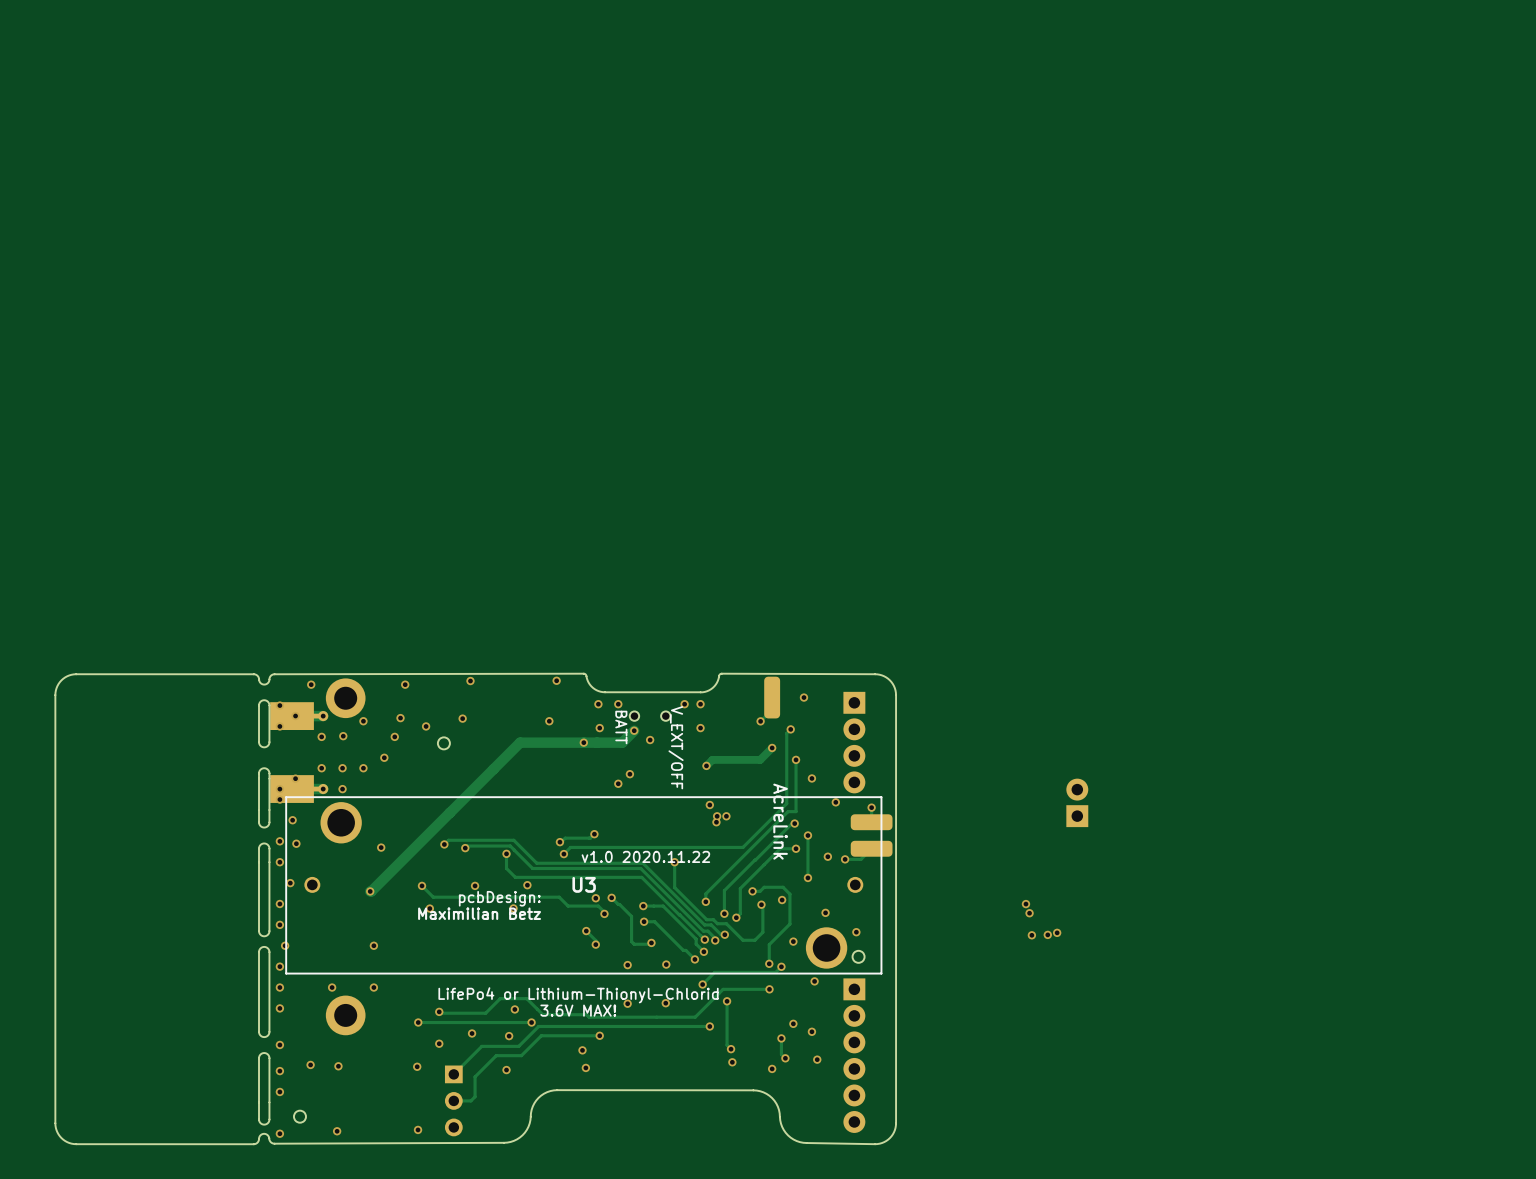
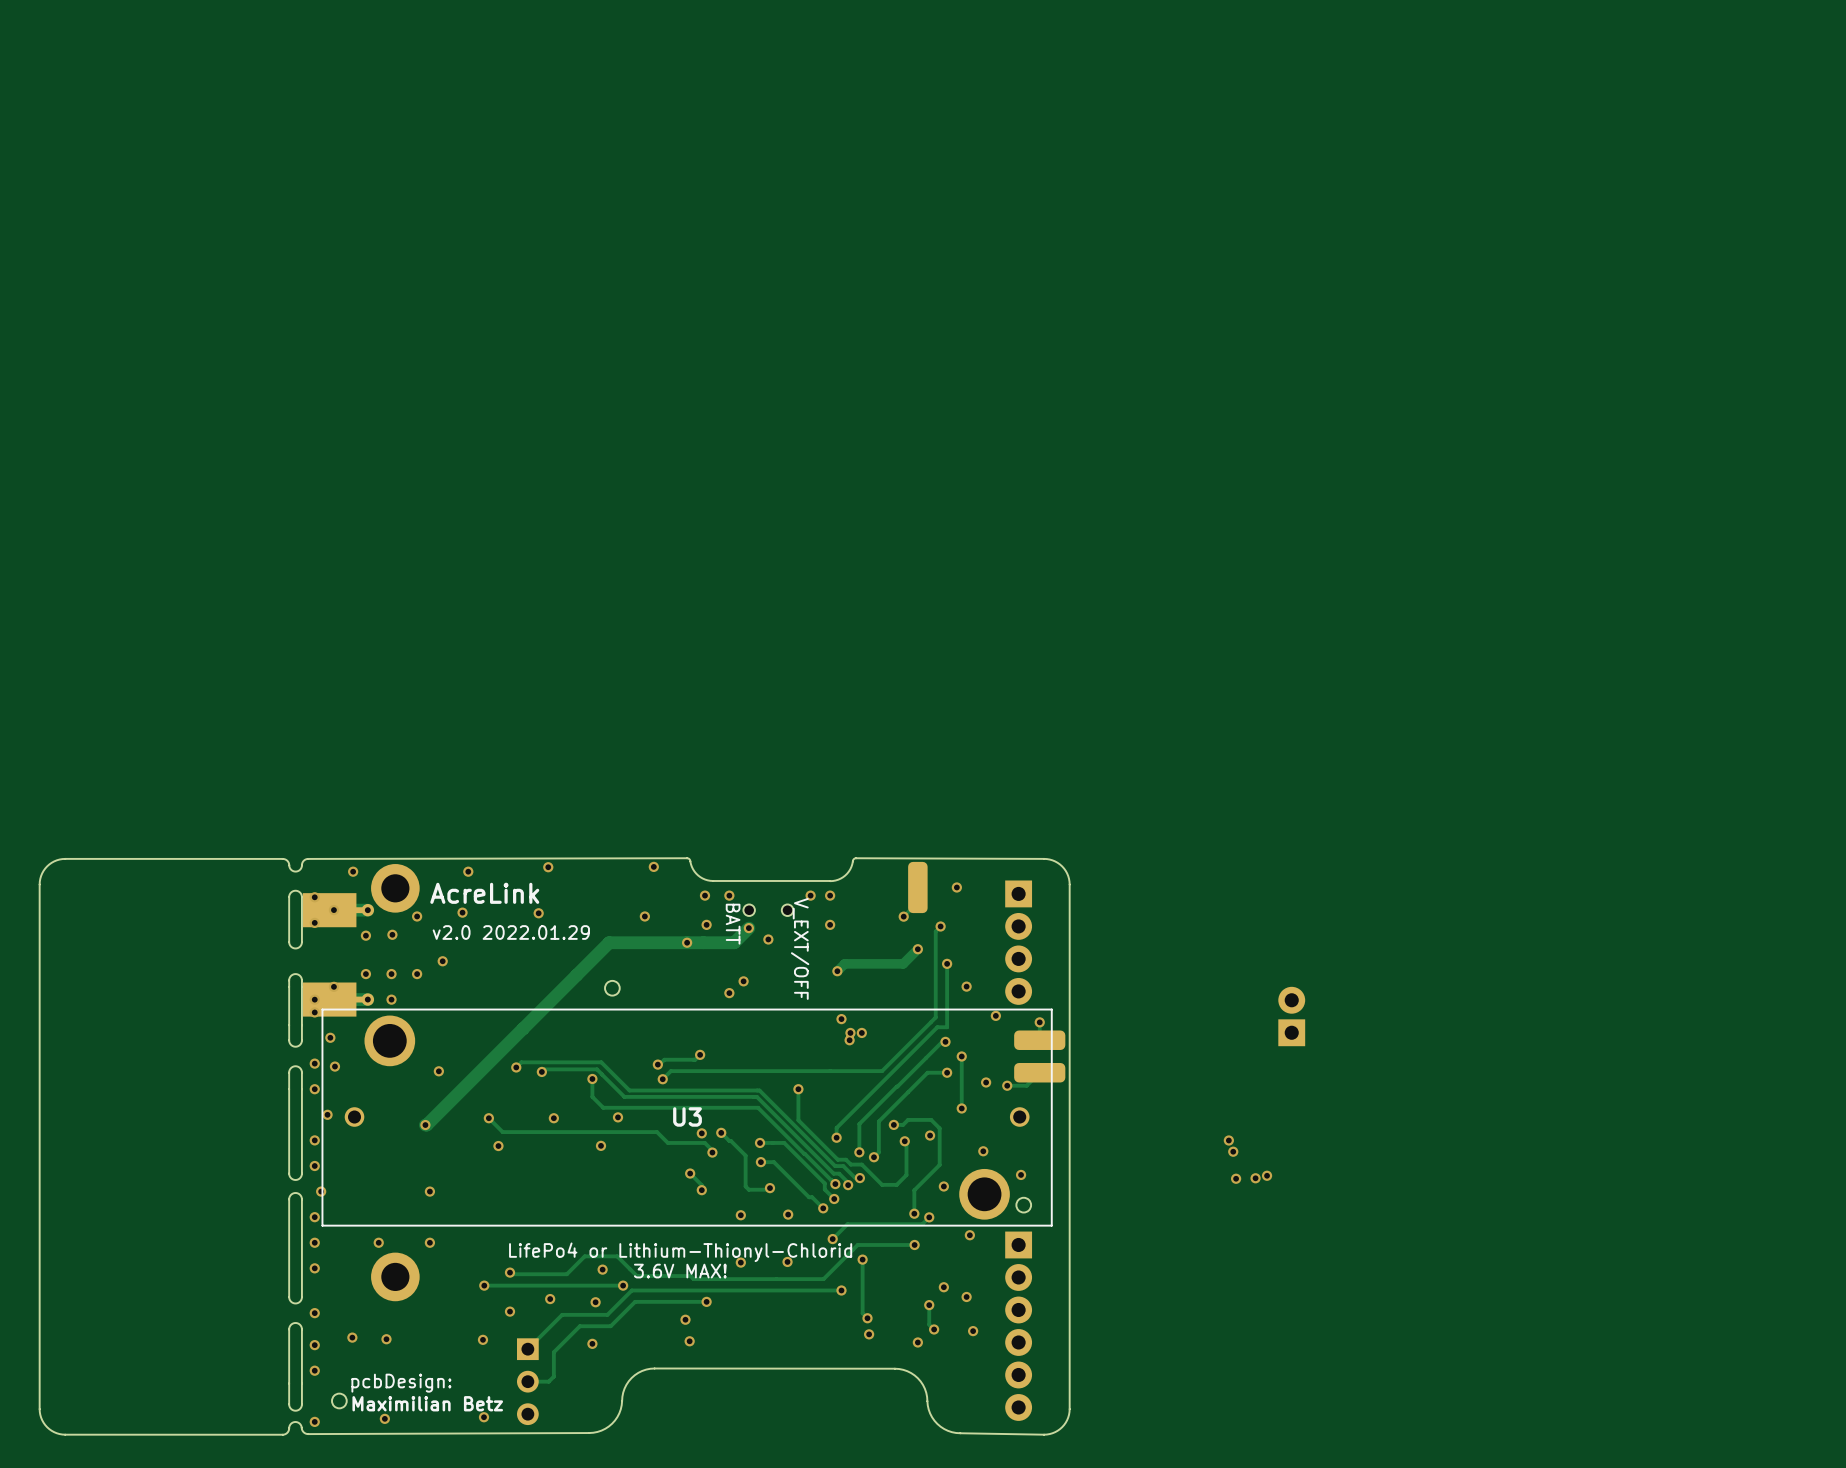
text: none -> AcreLink (484, 893)
via: (426, 726) -> none
text: none -> v2.0 2022.01.29 (511, 932)
via: (394, 736) -> none
round board edge position: (443, 743) -> (612, 988)
text: AcreLink (780, 821) -> none
text: v1.0 2020.11.22 (645, 856) -> none
text position: pcbDesign: (499, 898) -> pcbDesign: (401, 1383)
text position: Maximilian Betz (479, 913) -> Maximilian Betz (427, 1403)

